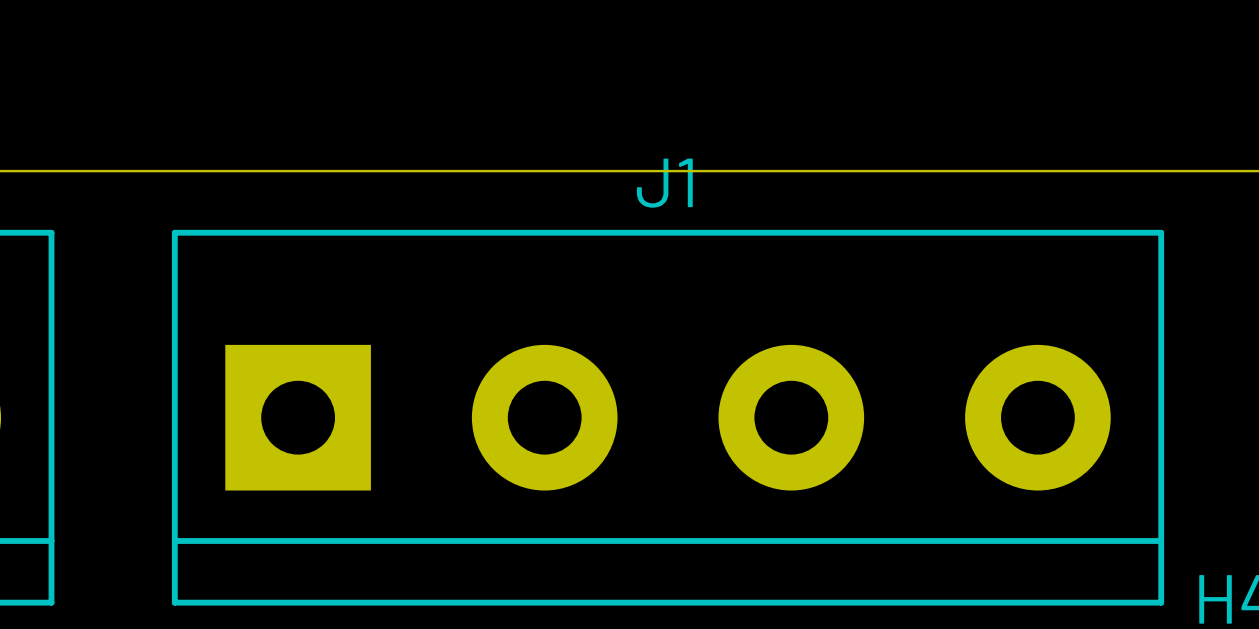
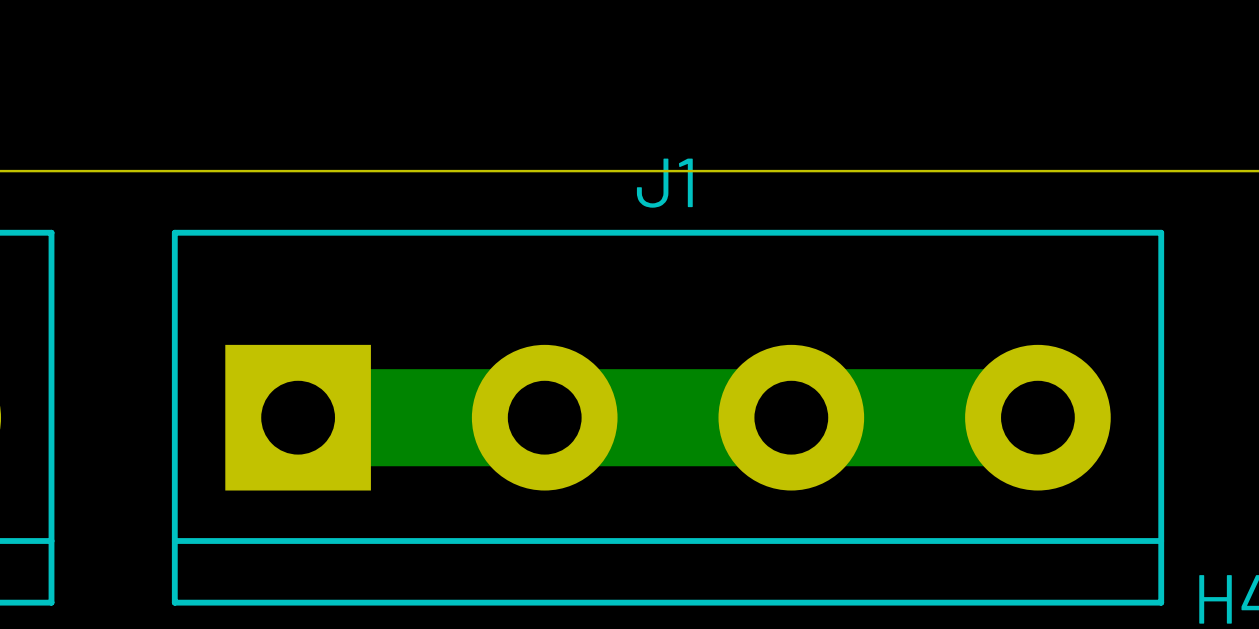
bottom track: none -> (298, 417) (1037, 417)

